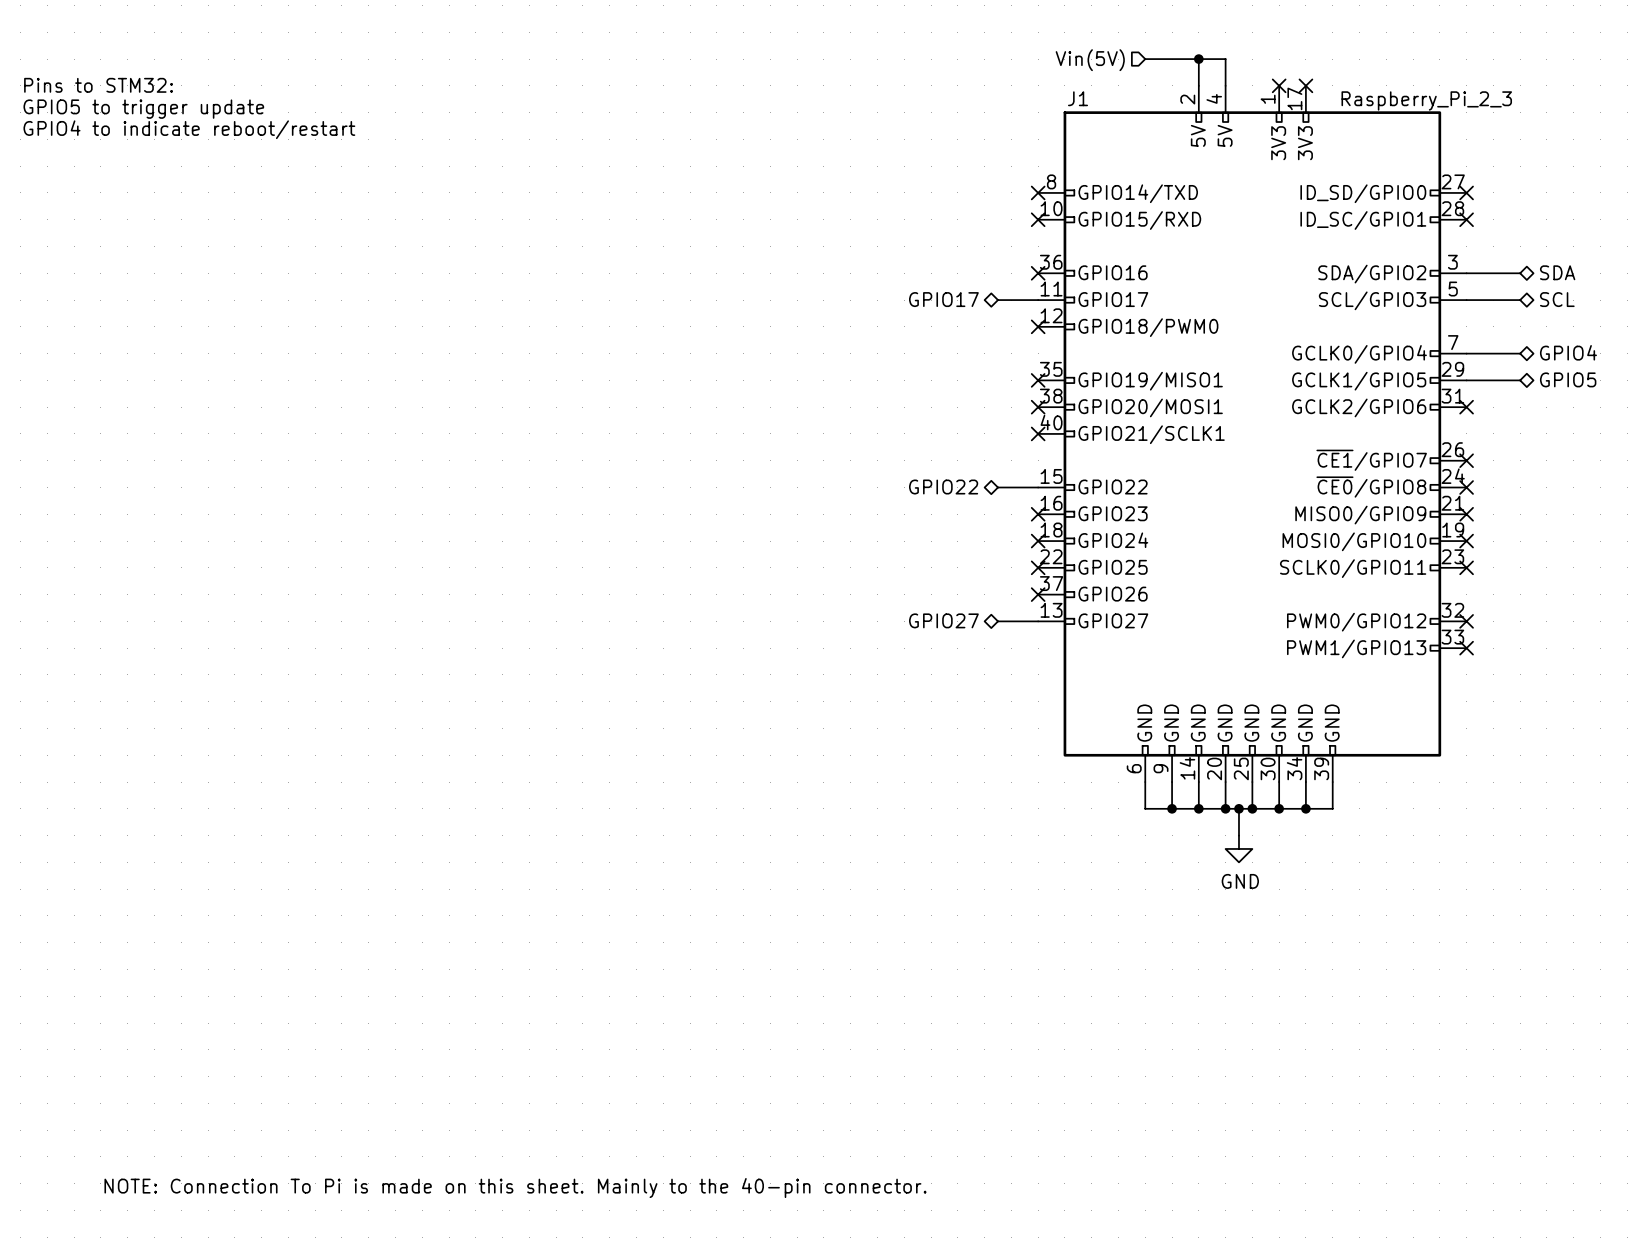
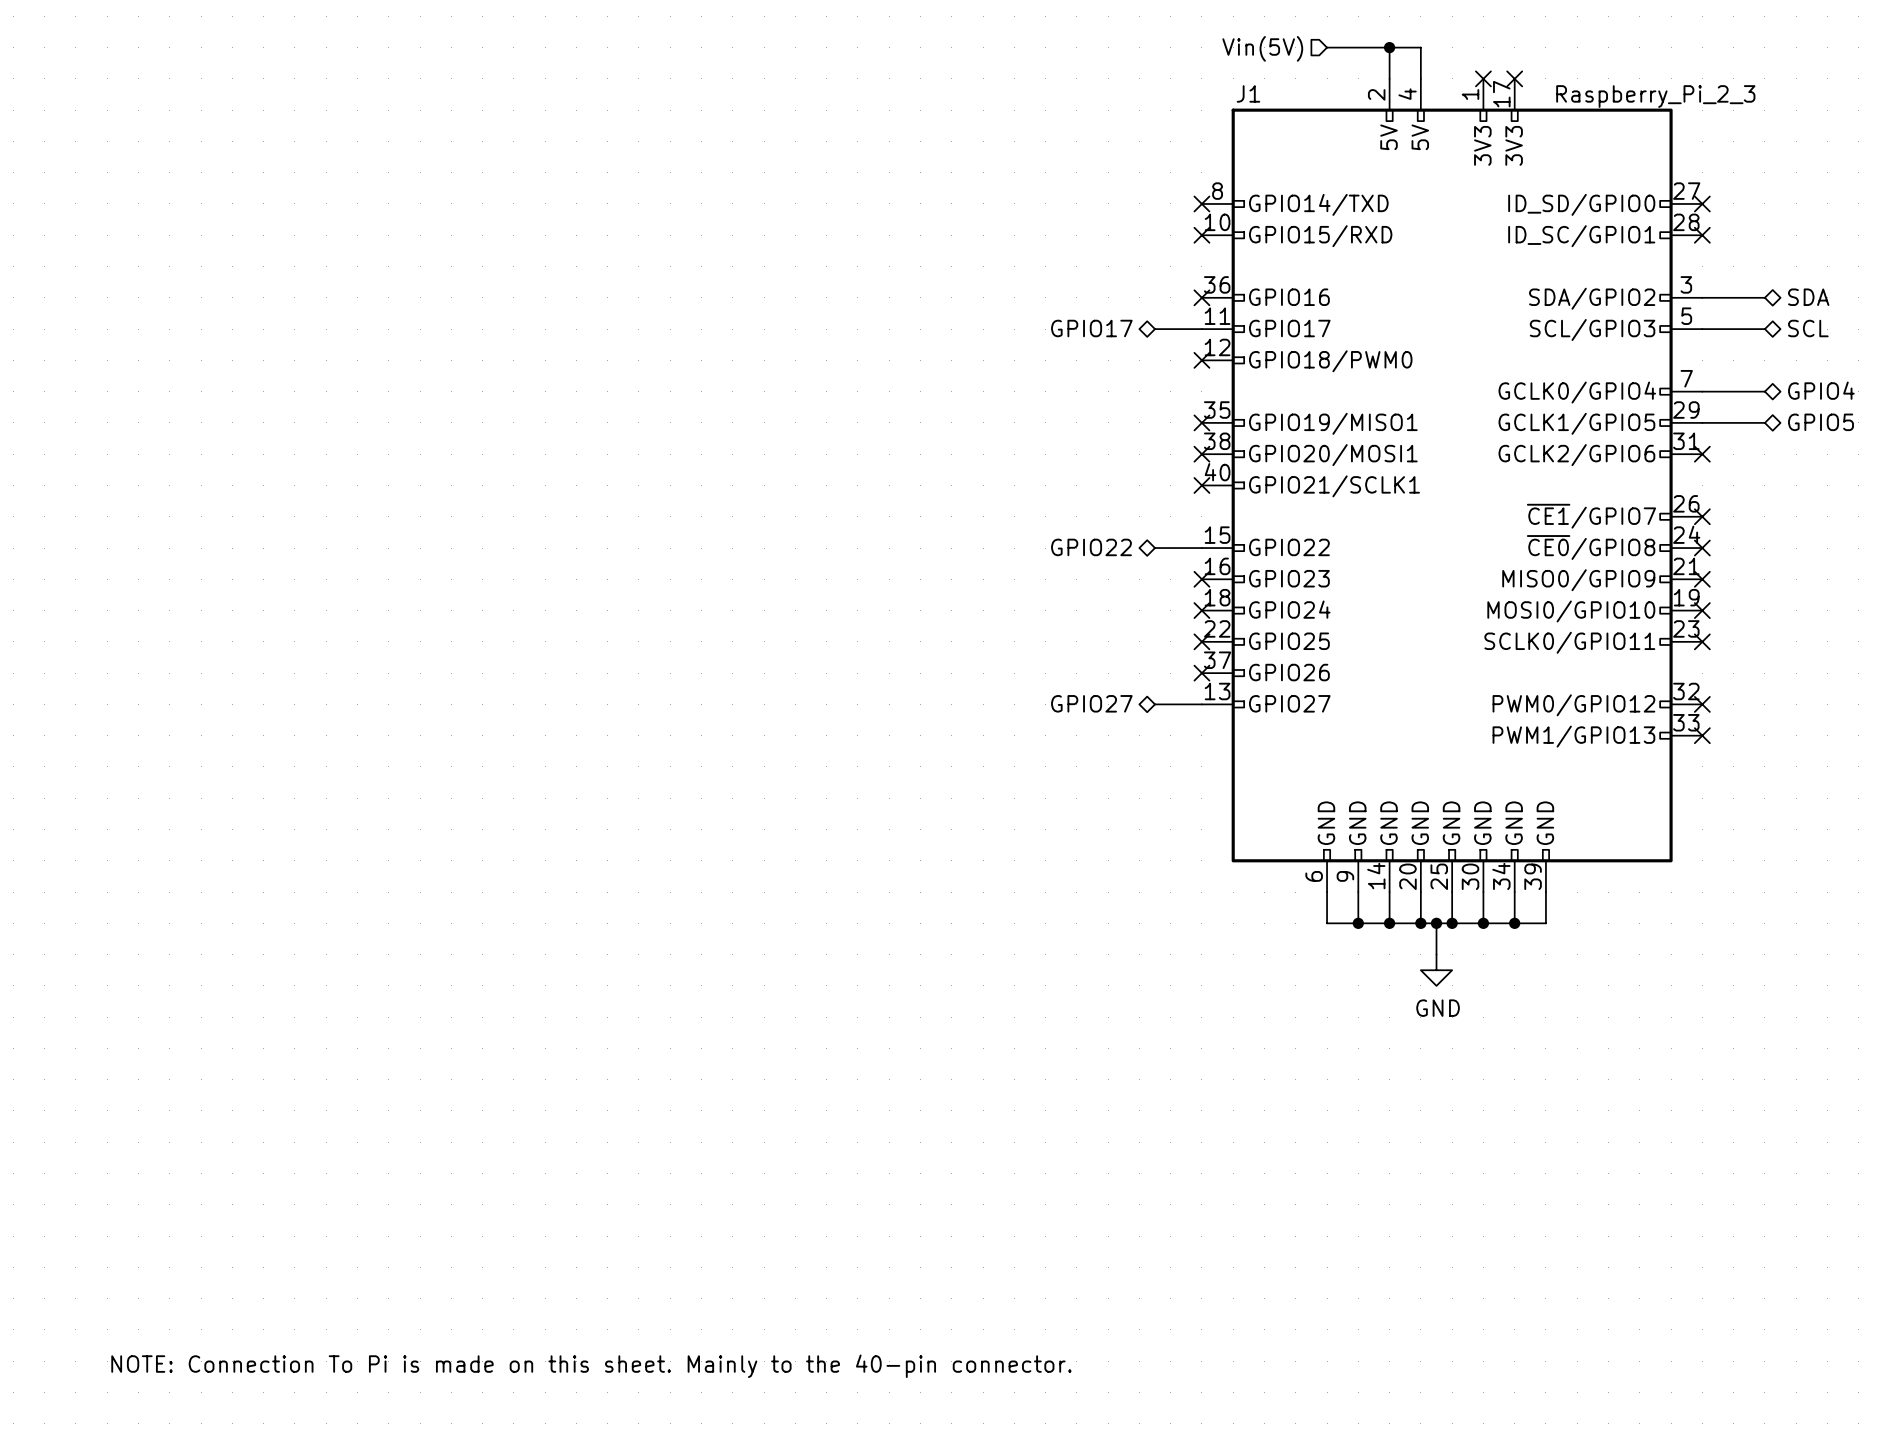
text: Pins to STM32: (98, 85) -> none
text: GPIO5 to trigger update (143, 109) -> none
text: GPIO4 to indicate reboot/restart (189, 129) -> none

